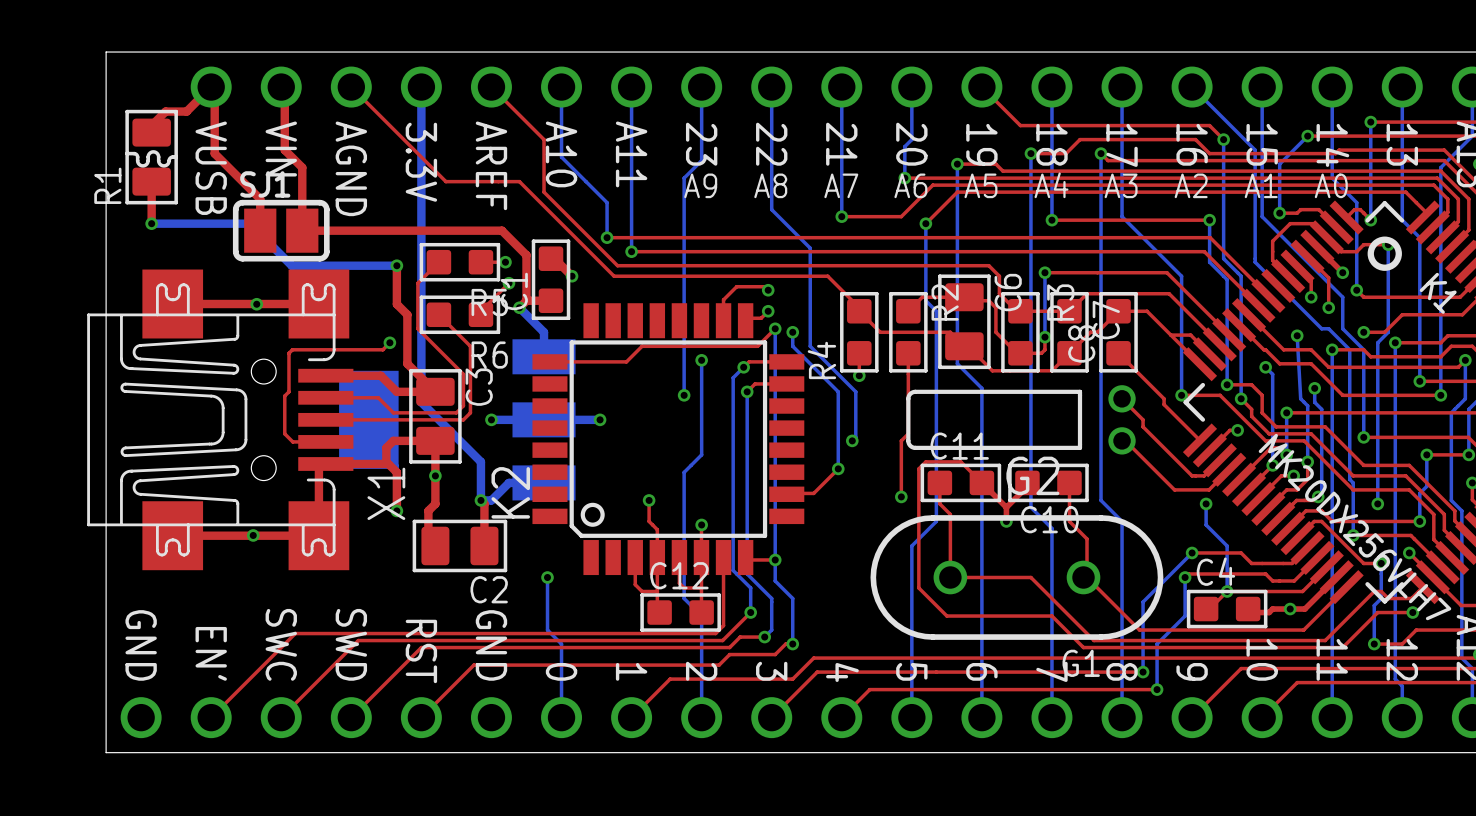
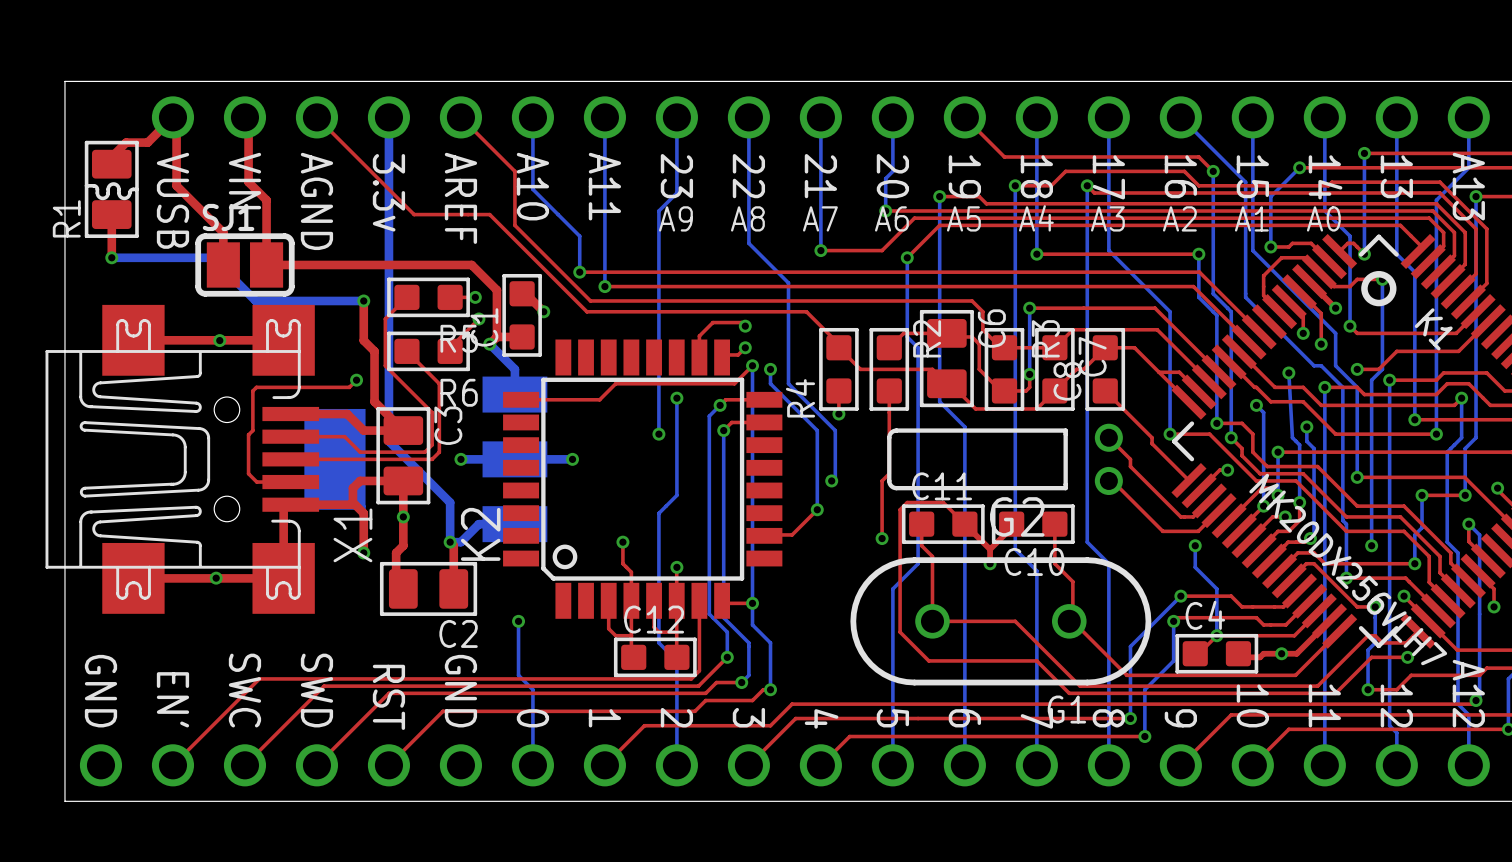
text: 3.3V (421, 162) -> 3.3v (388, 192)

